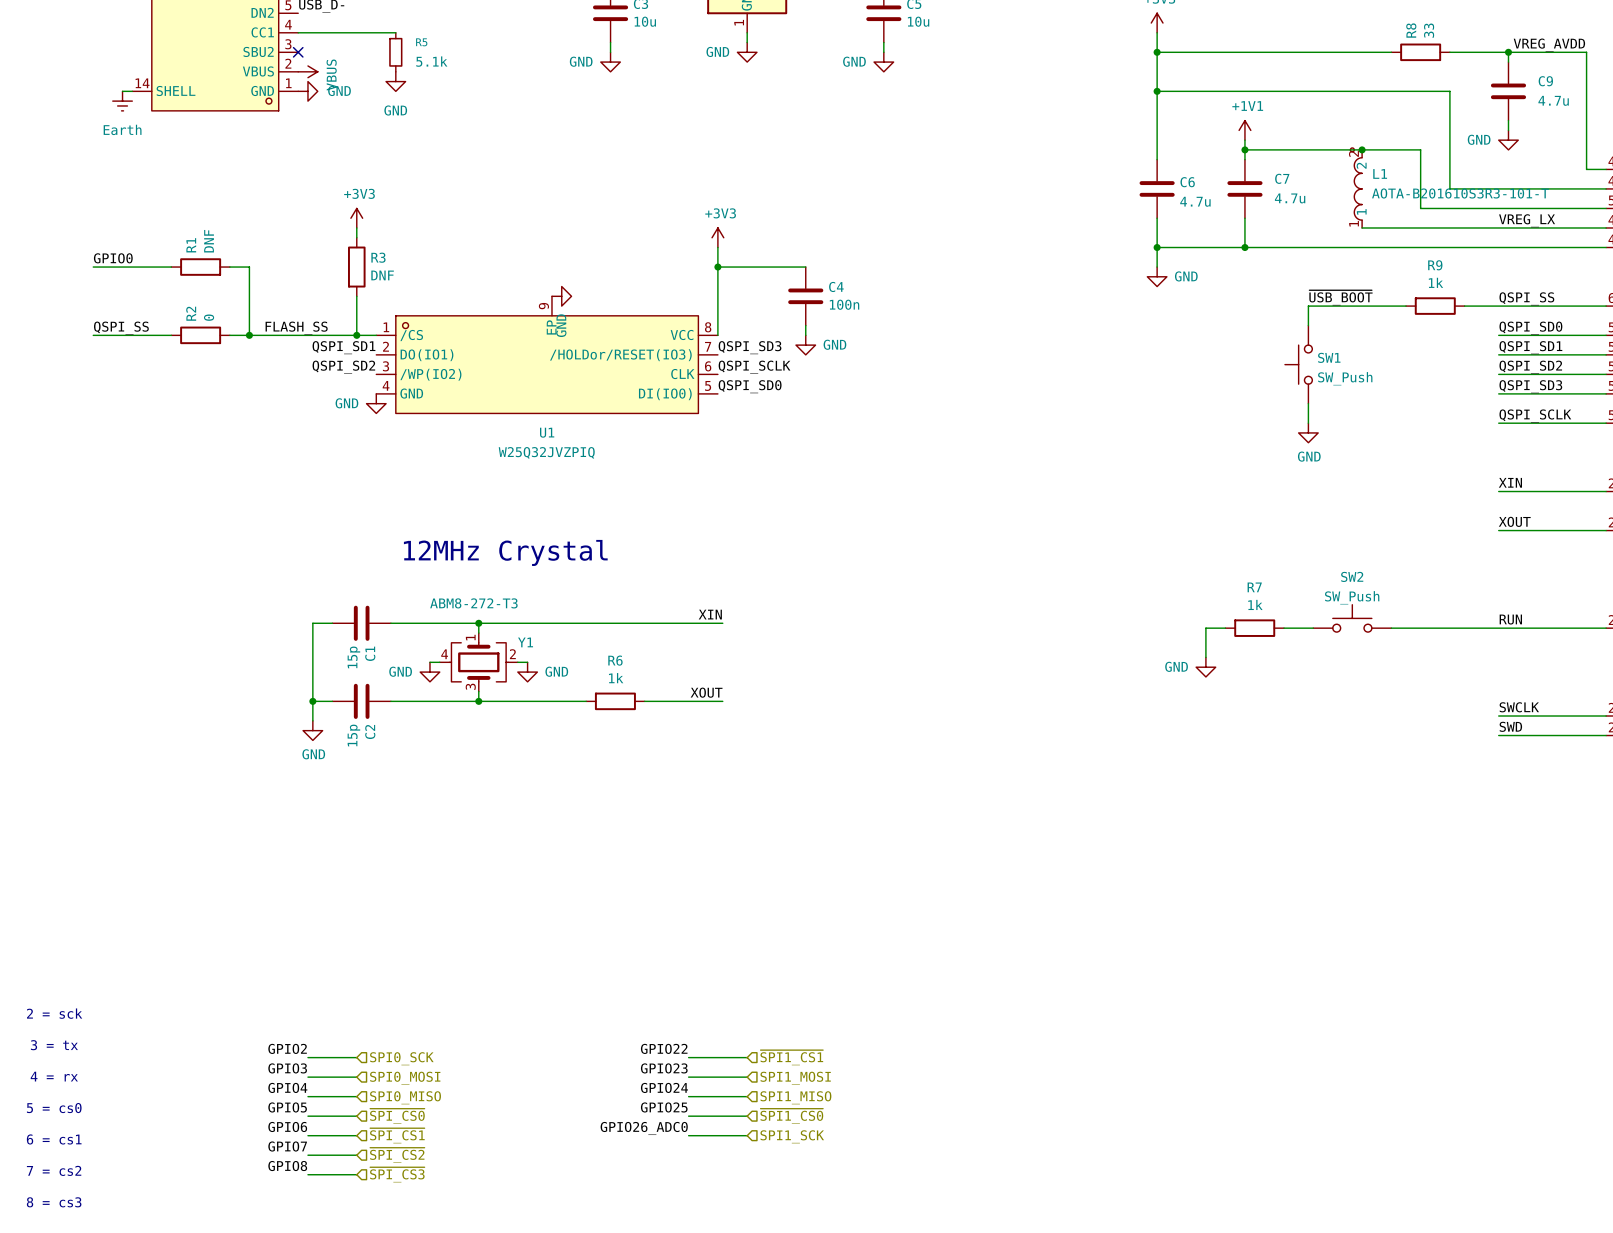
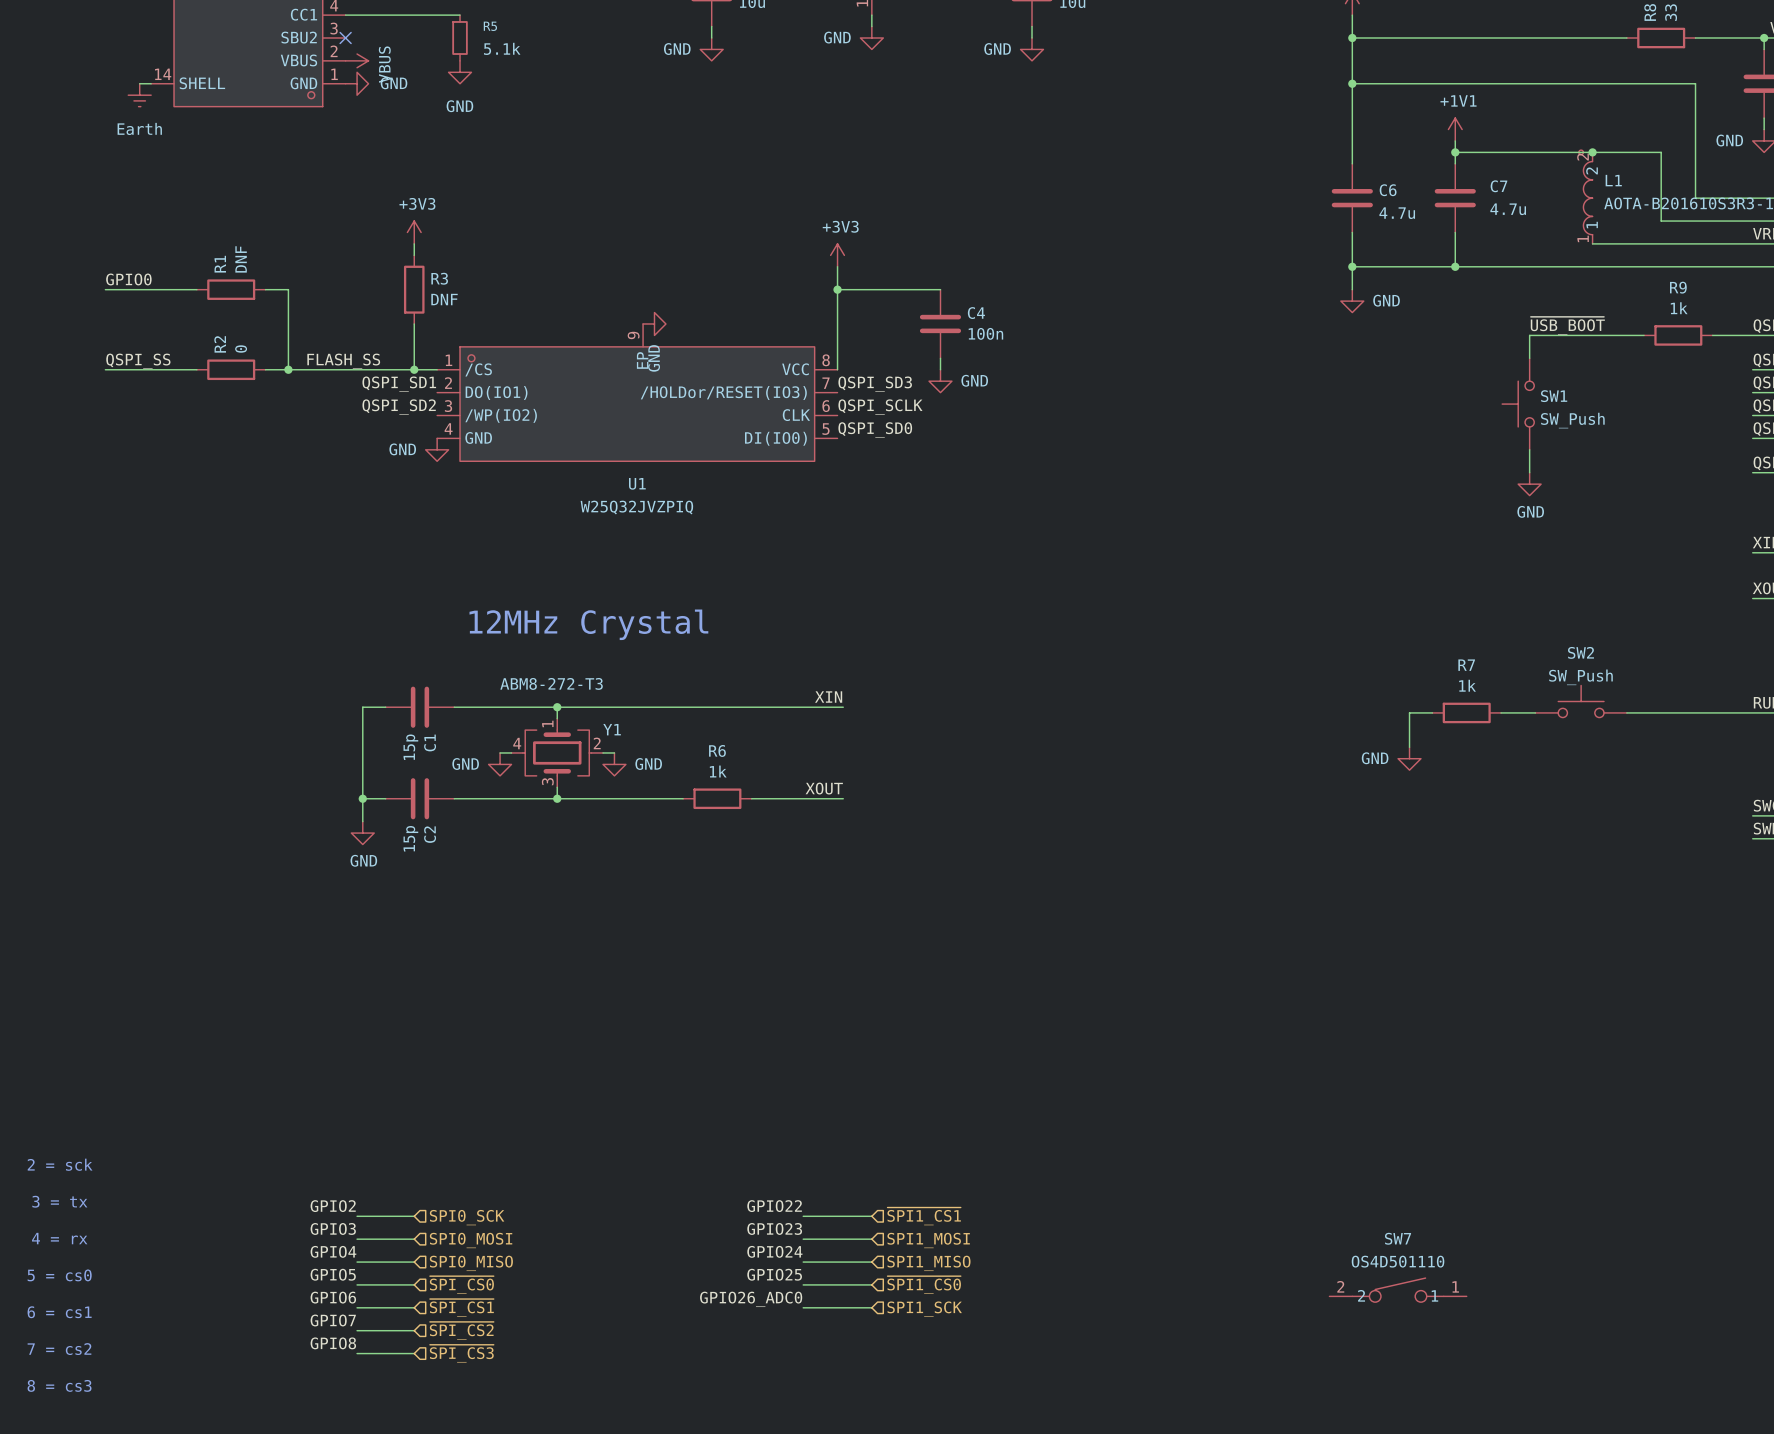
SW7: none -> OS4D501110 (1398, 1290)

